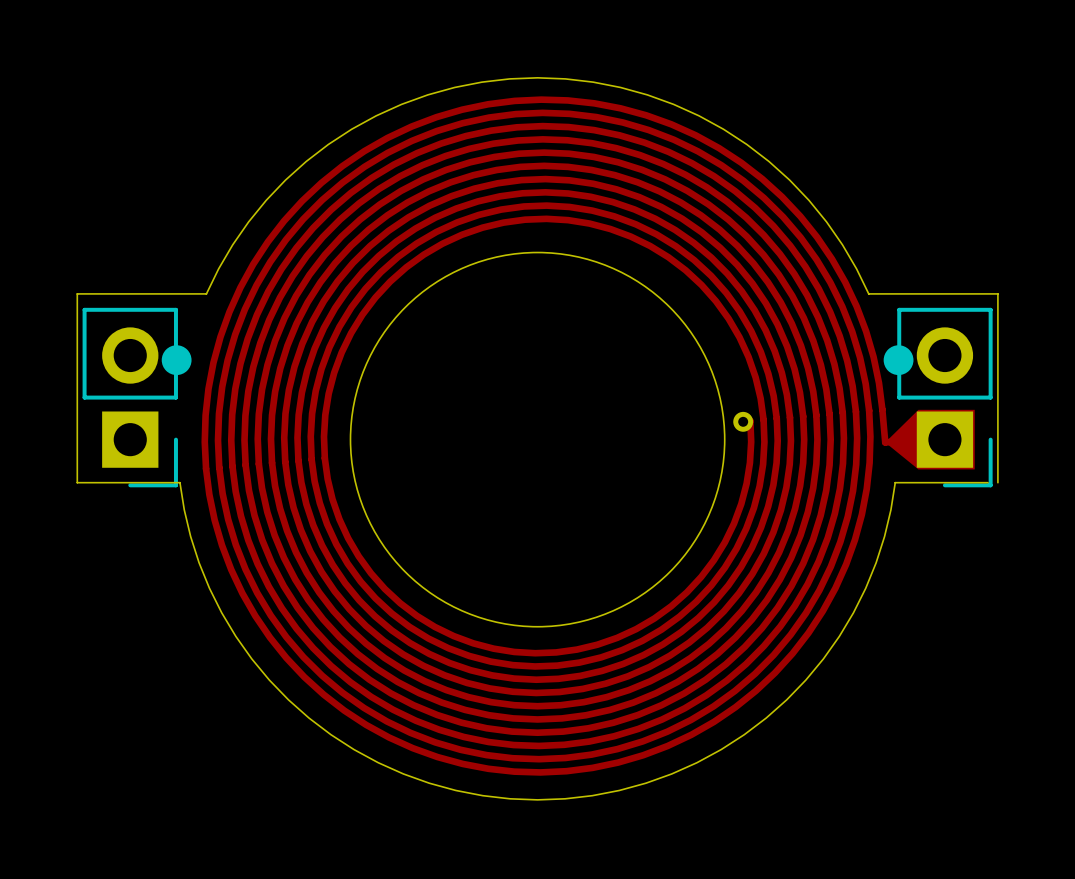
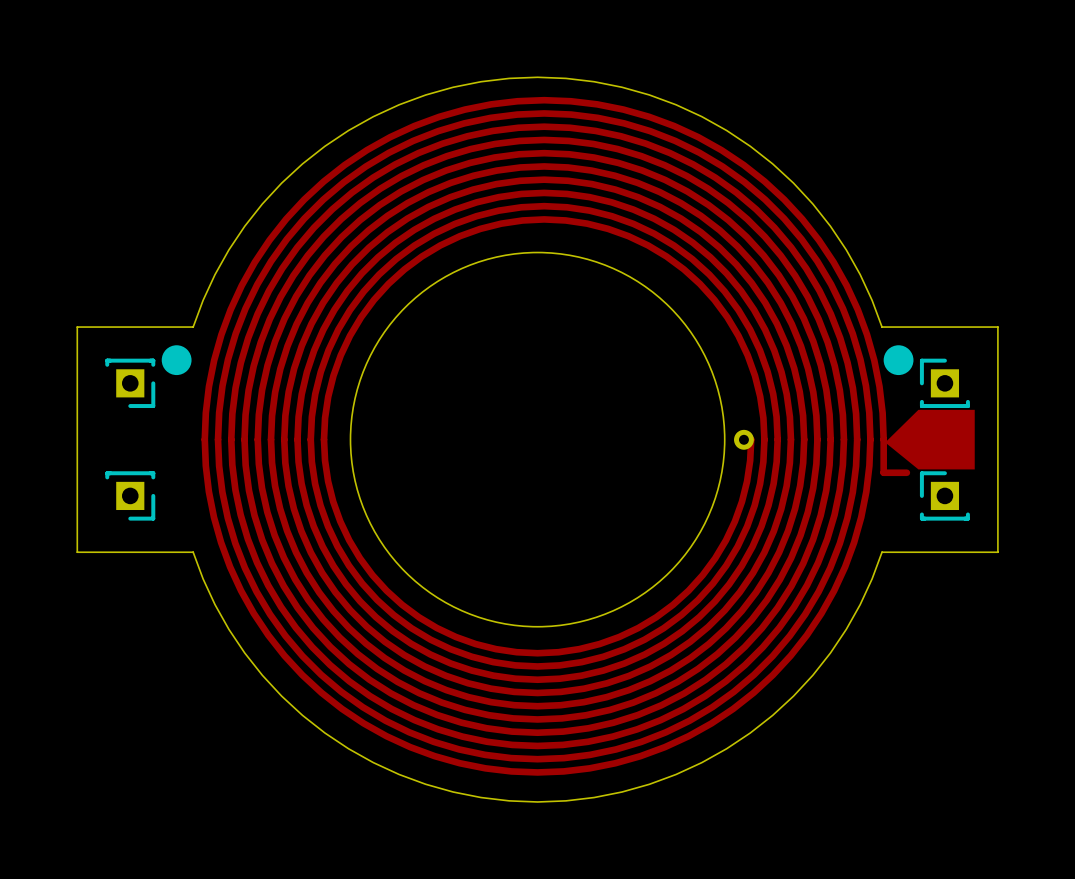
part footprint: [82, 307, 178, 488] -> [105, 358, 156, 409]
part footprint: [897, 307, 993, 488] -> [919, 358, 970, 409]
board edge: (77, 327) (77, 293) (206, 293) (218, 268) (248, 221) (285, 180) (328, 144) (376, 115) (401, 104) (454, 87) (509, 78) (537, 77) (593, 82) (620, 87) (647, 94) (699, 115) (746, 144) (789, 180) (826, 221) (842, 244) (868, 293) (997, 293) (997, 327) -> (77, 327) (193, 327) (215, 274) (244, 226) (281, 183) (324, 146) (373, 116) (425, 94) (481, 81) (537, 77) (594, 81) (649, 94) (701, 116) (750, 146) (793, 183) (830, 226) (860, 274) (882, 327) (997, 327)
part rotation: 0° (556, 436) -> 5° clockwise (555, 436)
board edge: (77, 482) (179, 482) (190, 536) (209, 588) (221, 612) (251, 658) (269, 680) (288, 699) (330, 734) (378, 762) (429, 783) (482, 795) (537, 799) (592, 795) (645, 783) (696, 762) (744, 734) (786, 699) (805, 680) (839, 636) (865, 588) (876, 562) (890, 509) (895, 482) (987, 482) -> (77, 482) (77, 552) (193, 552) (215, 604) (244, 653) (281, 696) (324, 732) (373, 762) (425, 784) (481, 797) (537, 801) (594, 797) (649, 784) (701, 762) (750, 732) (793, 696) (830, 653) (860, 604) (882, 552) (997, 552) (997, 482)
part: none -> (130, 495)
part: none -> (944, 495)

